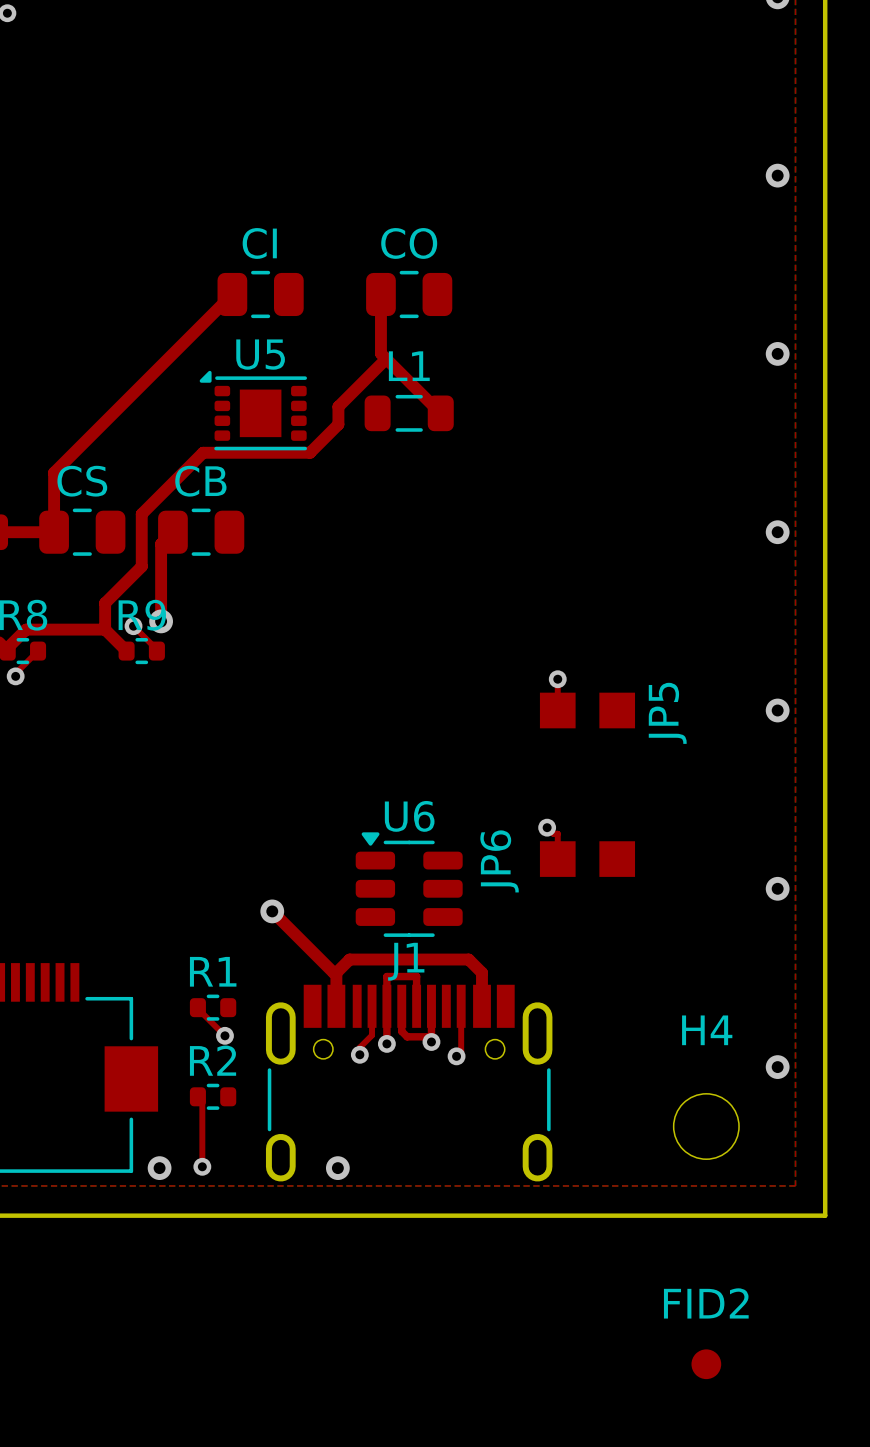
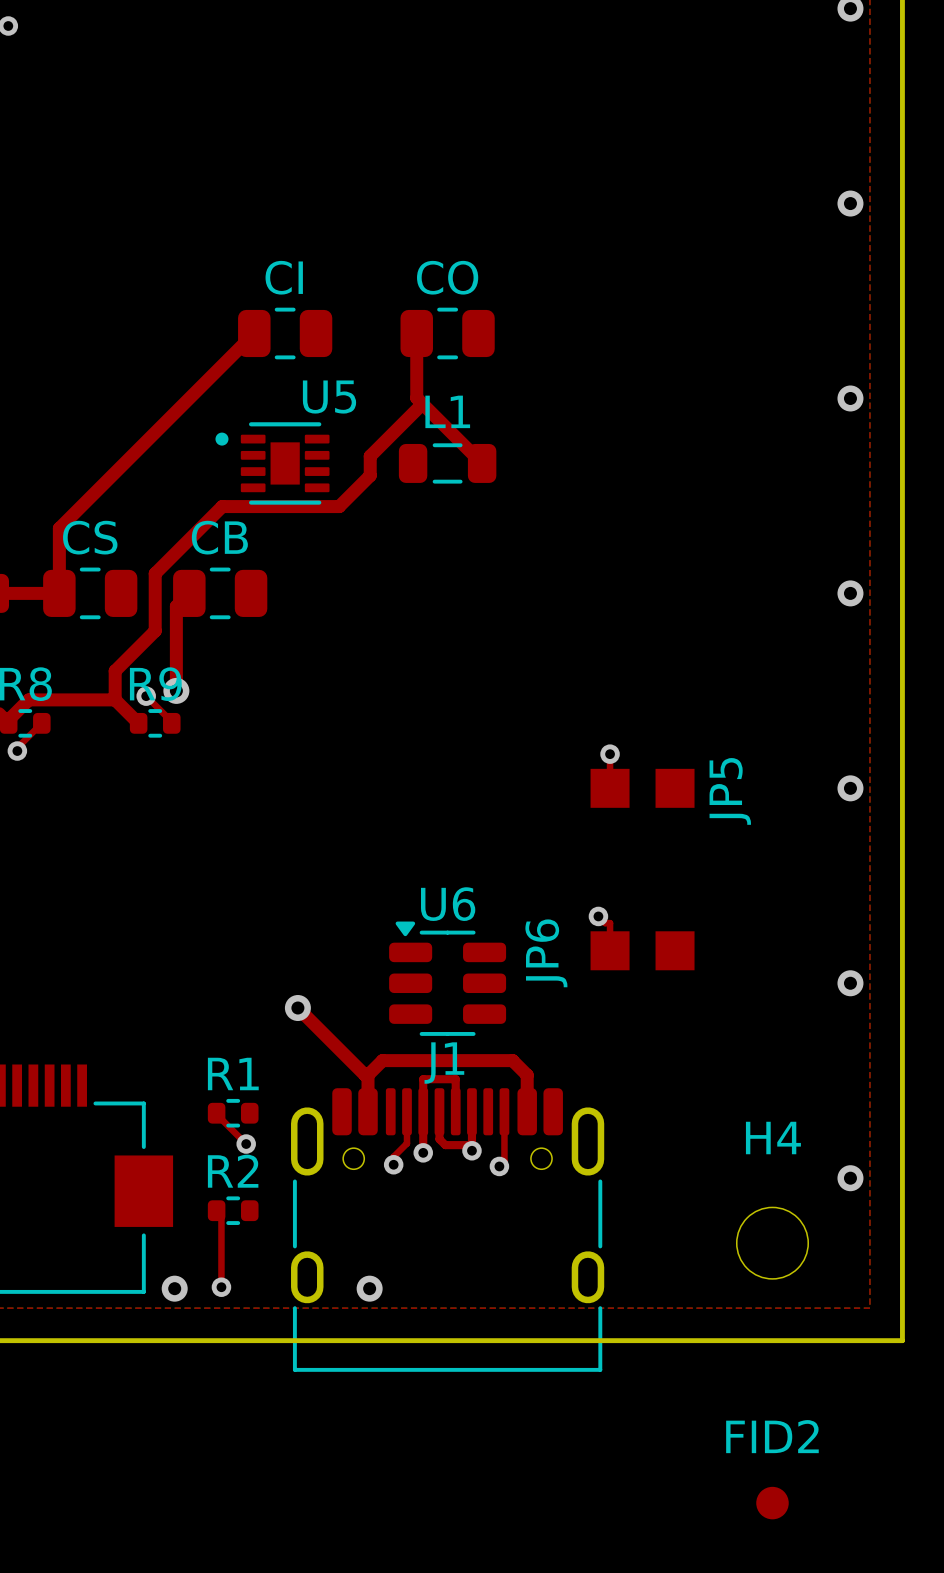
U5 name position: U5 (260, 354) -> U5 (329, 397)
U5 footprint: [199, 370, 307, 451] -> [215, 422, 330, 505]
J1 footprint: [265, 984, 553, 1182] -> [291, 1088, 605, 1372]

